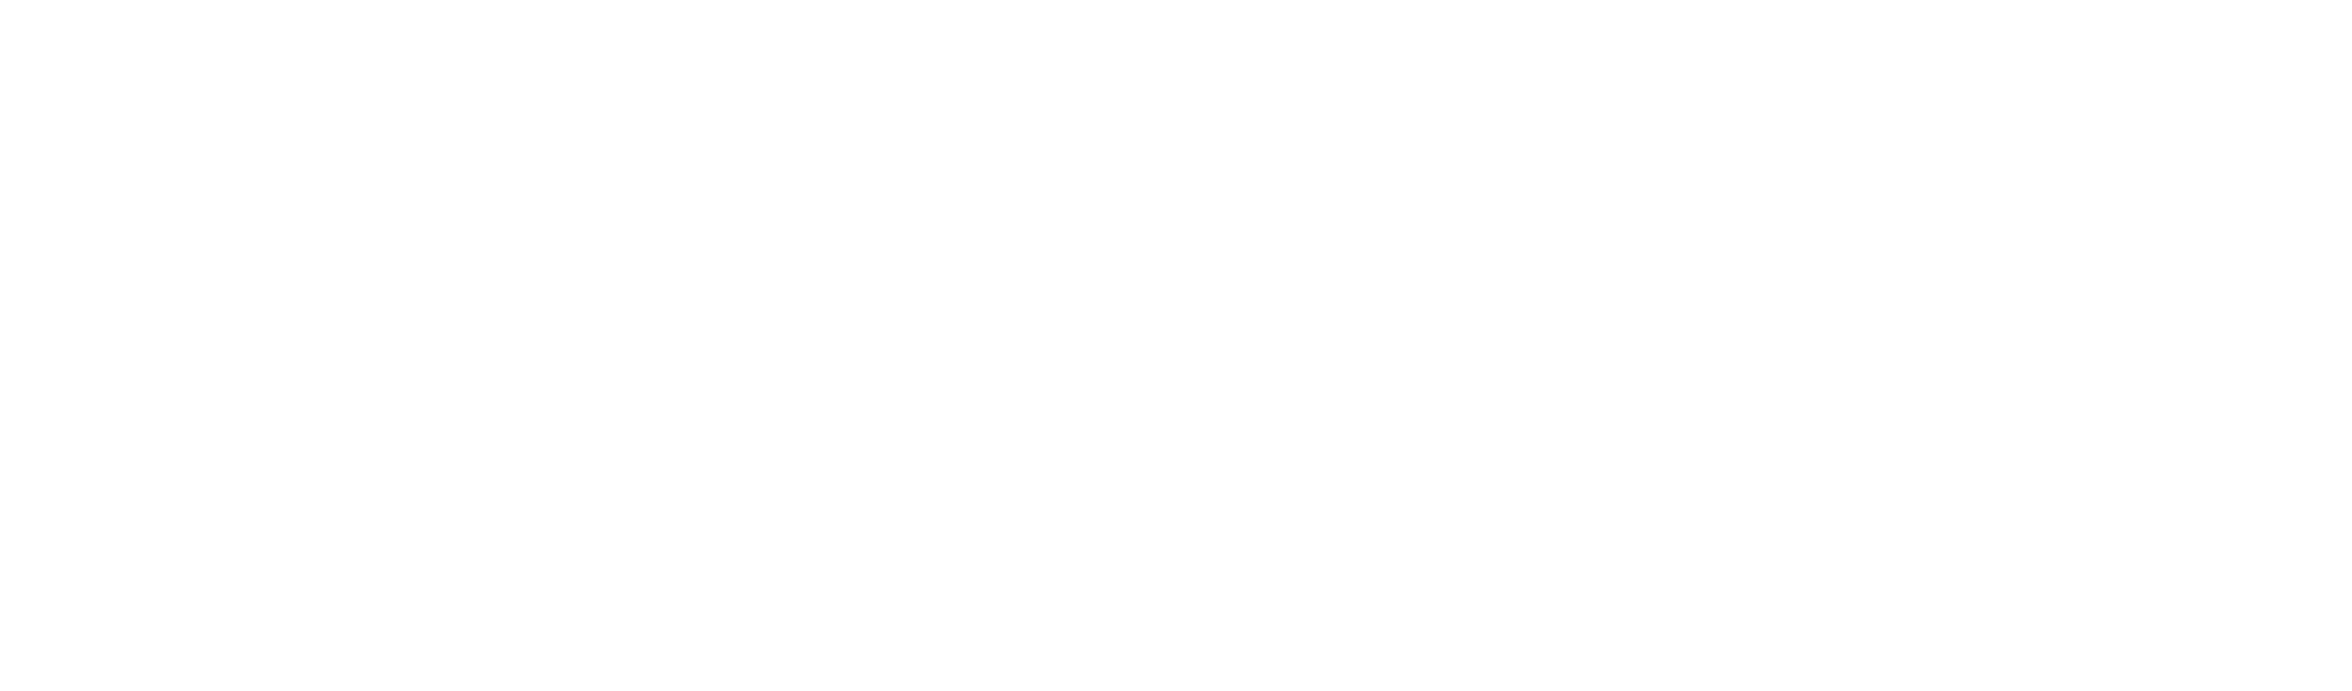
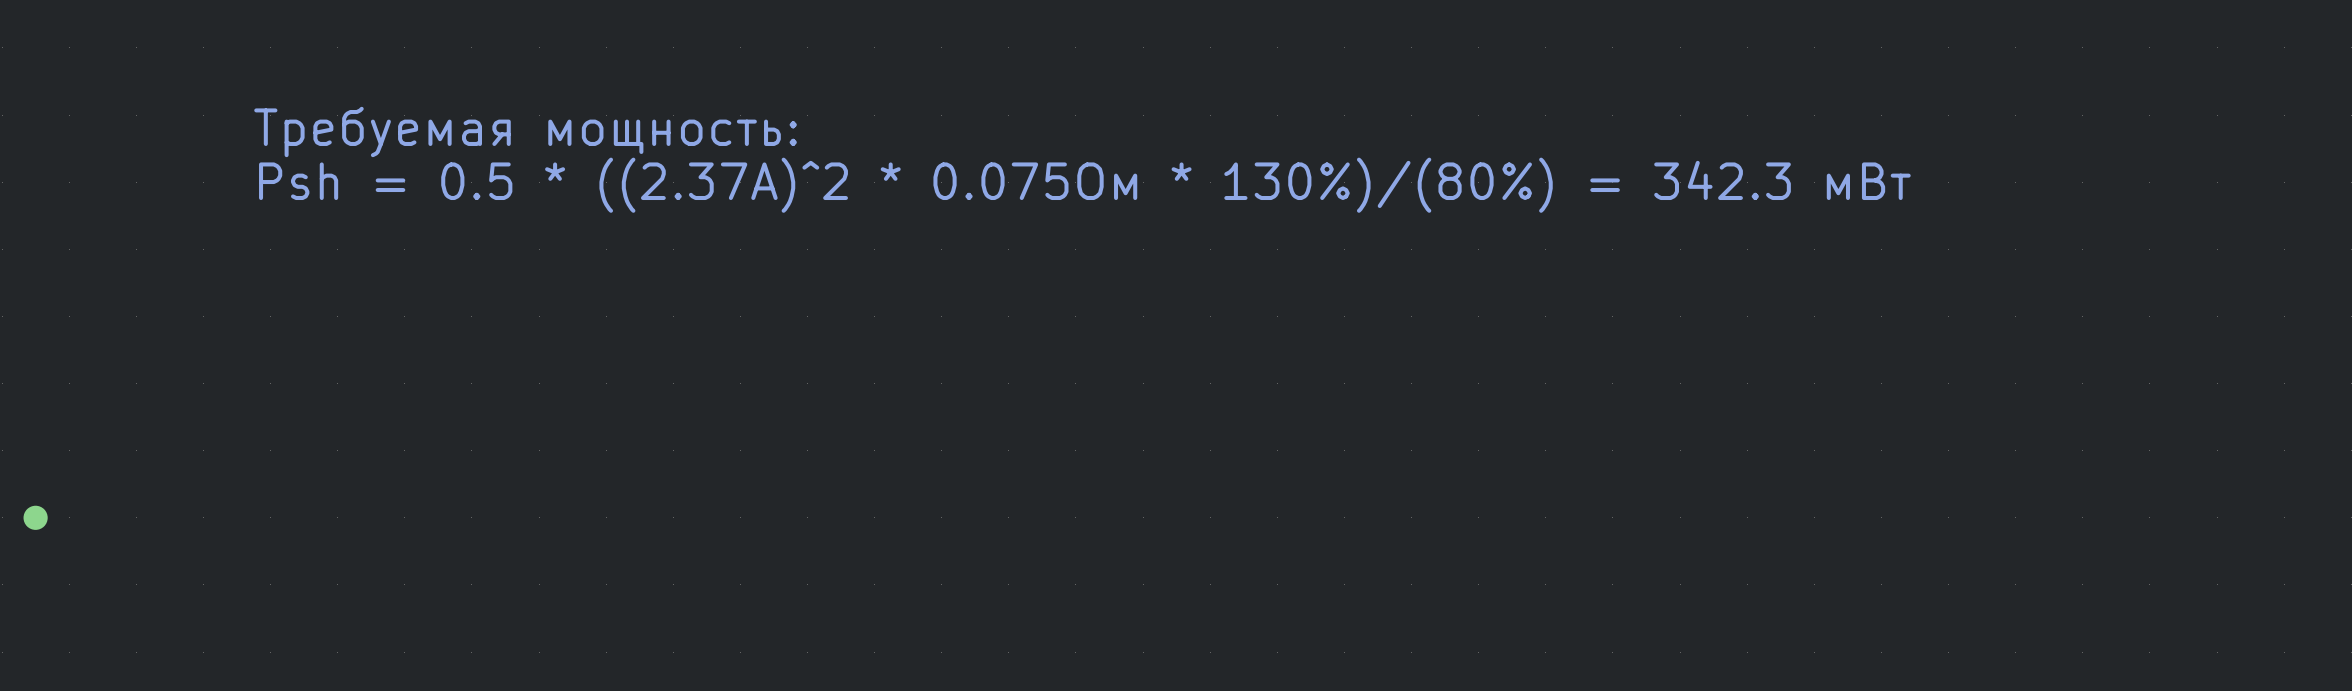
text: none -> Требуемая мощность: (525, 131)
text: none -> Psh = 0.5 * ((2.37А)^2 * 0.075Ом * 130%)/(80%) = 342.3 мВт (1084, 185)
junction: none -> (35, 517)

